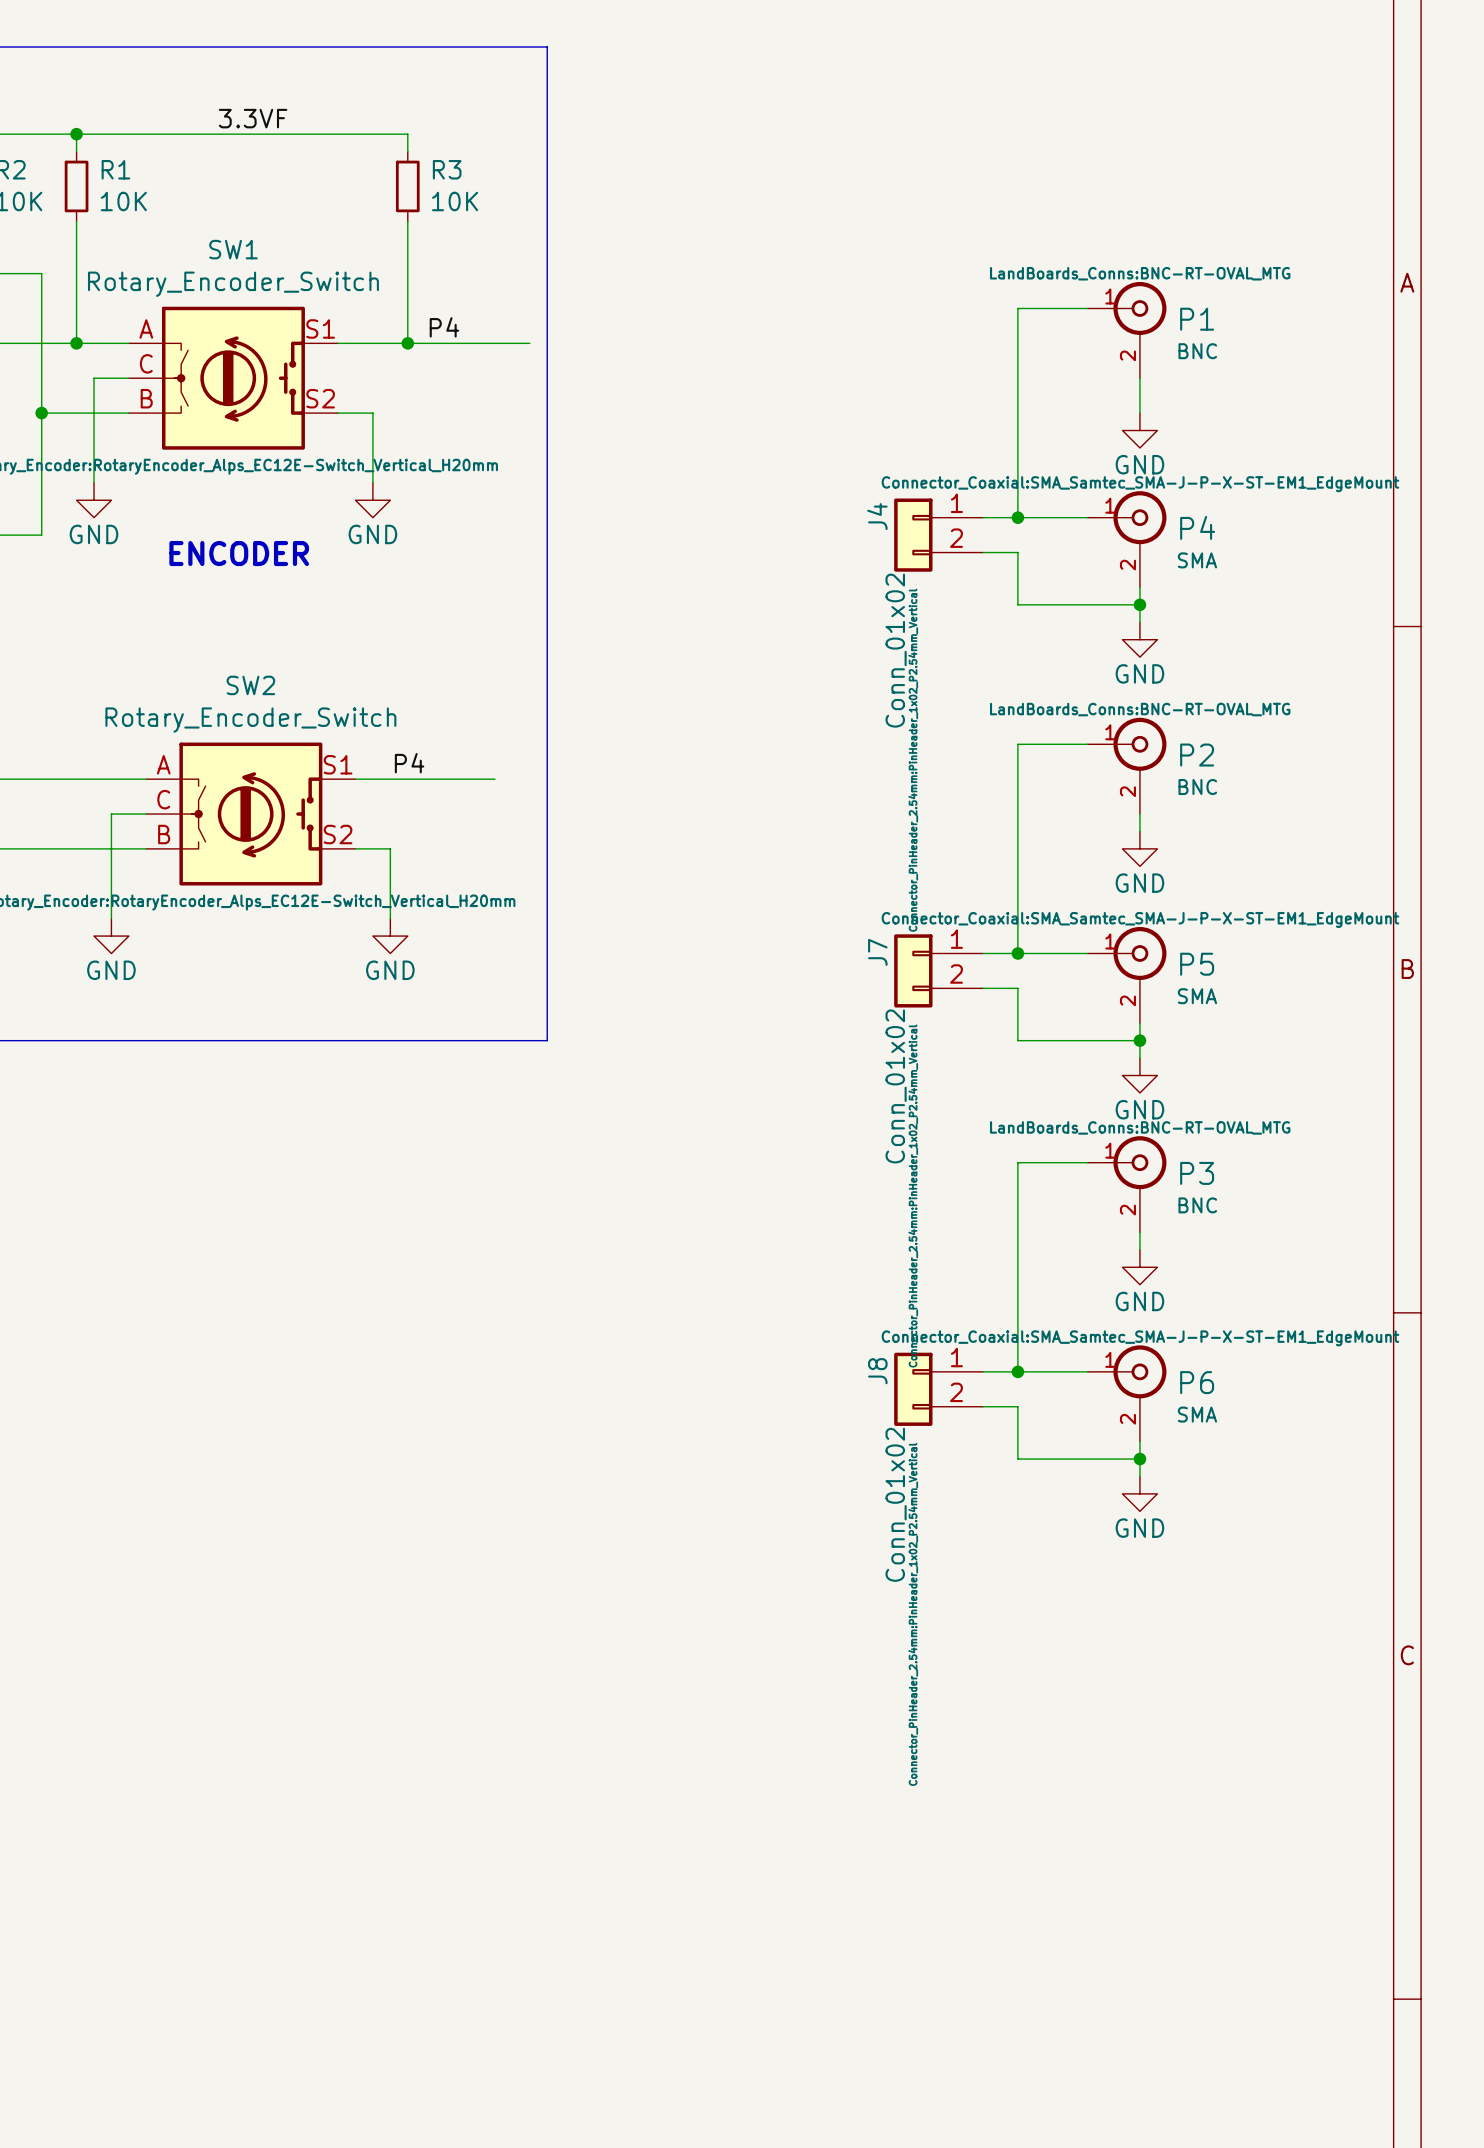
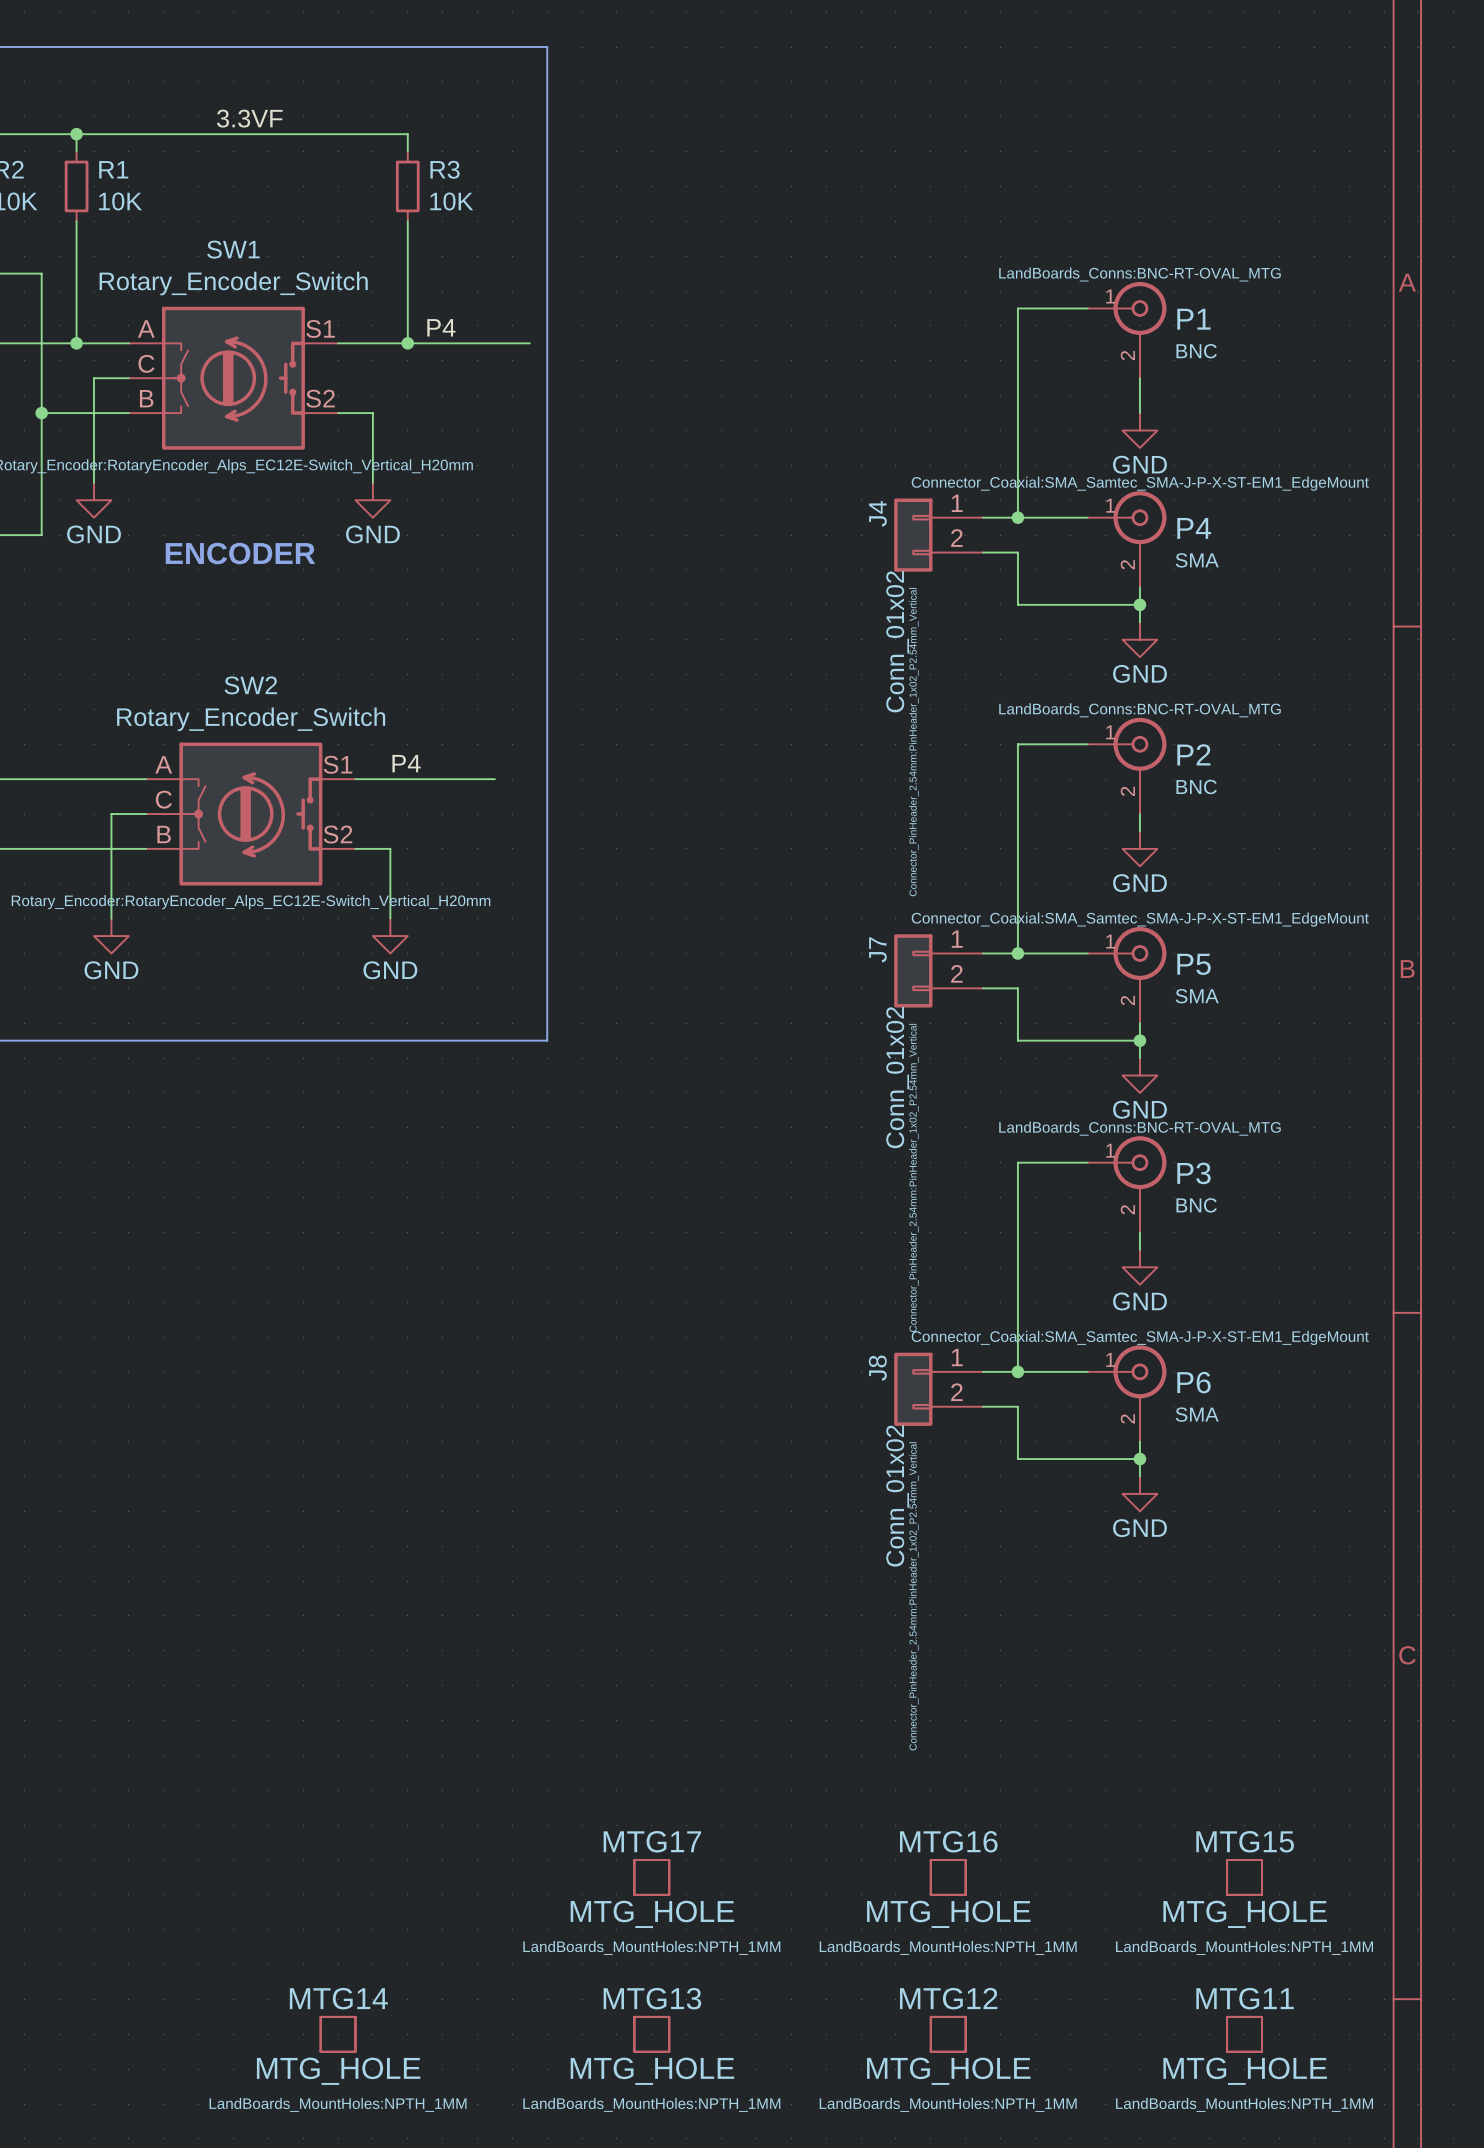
MTG17: none -> MTG_HOLE (651, 1877)
MTG16: none -> MTG_HOLE (948, 1877)
MTG15: none -> MTG_HOLE (1244, 1877)
MTG14: none -> MTG_HOLE (338, 2034)
MTG13: none -> MTG_HOLE (651, 2034)
MTG12: none -> MTG_HOLE (948, 2034)
MTG11: none -> MTG_HOLE (1244, 2034)

